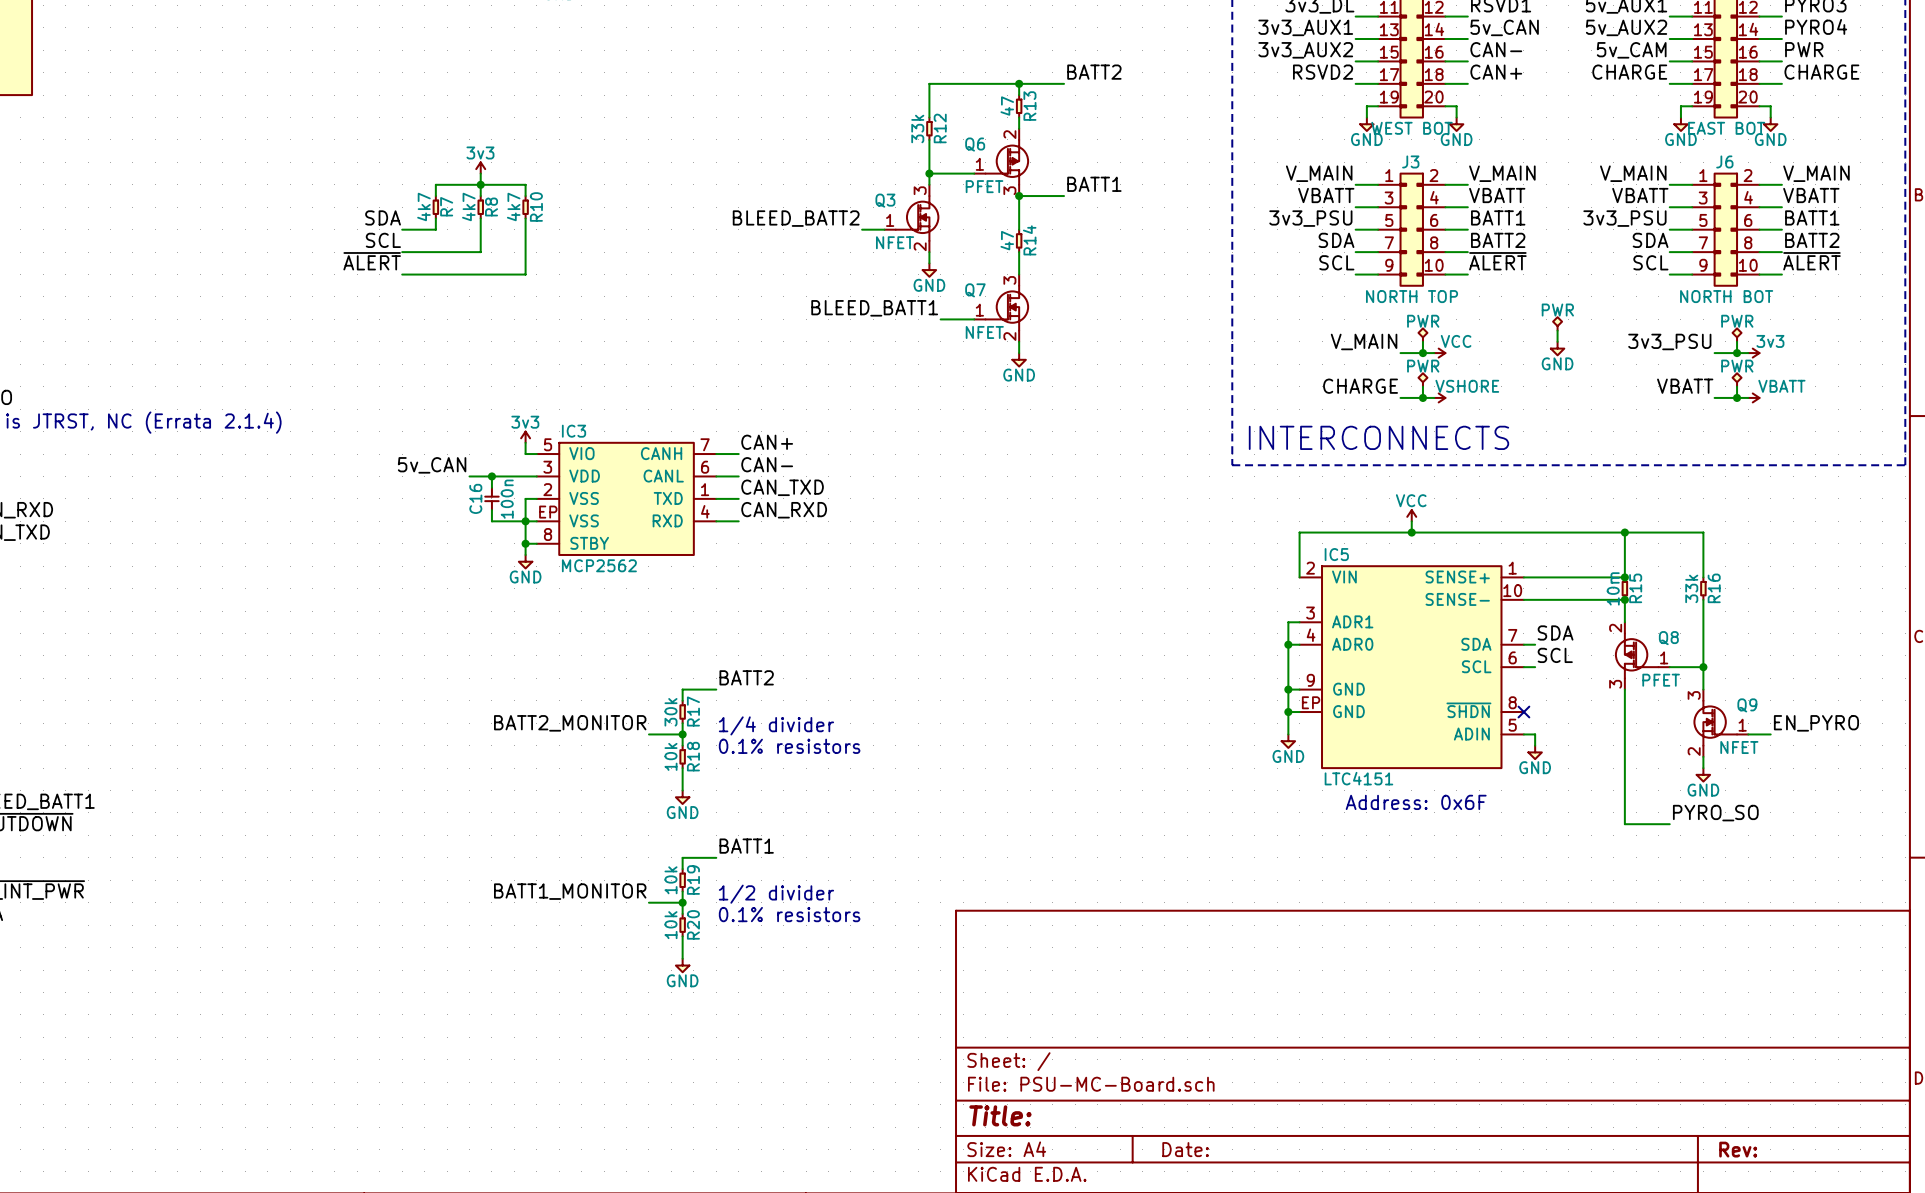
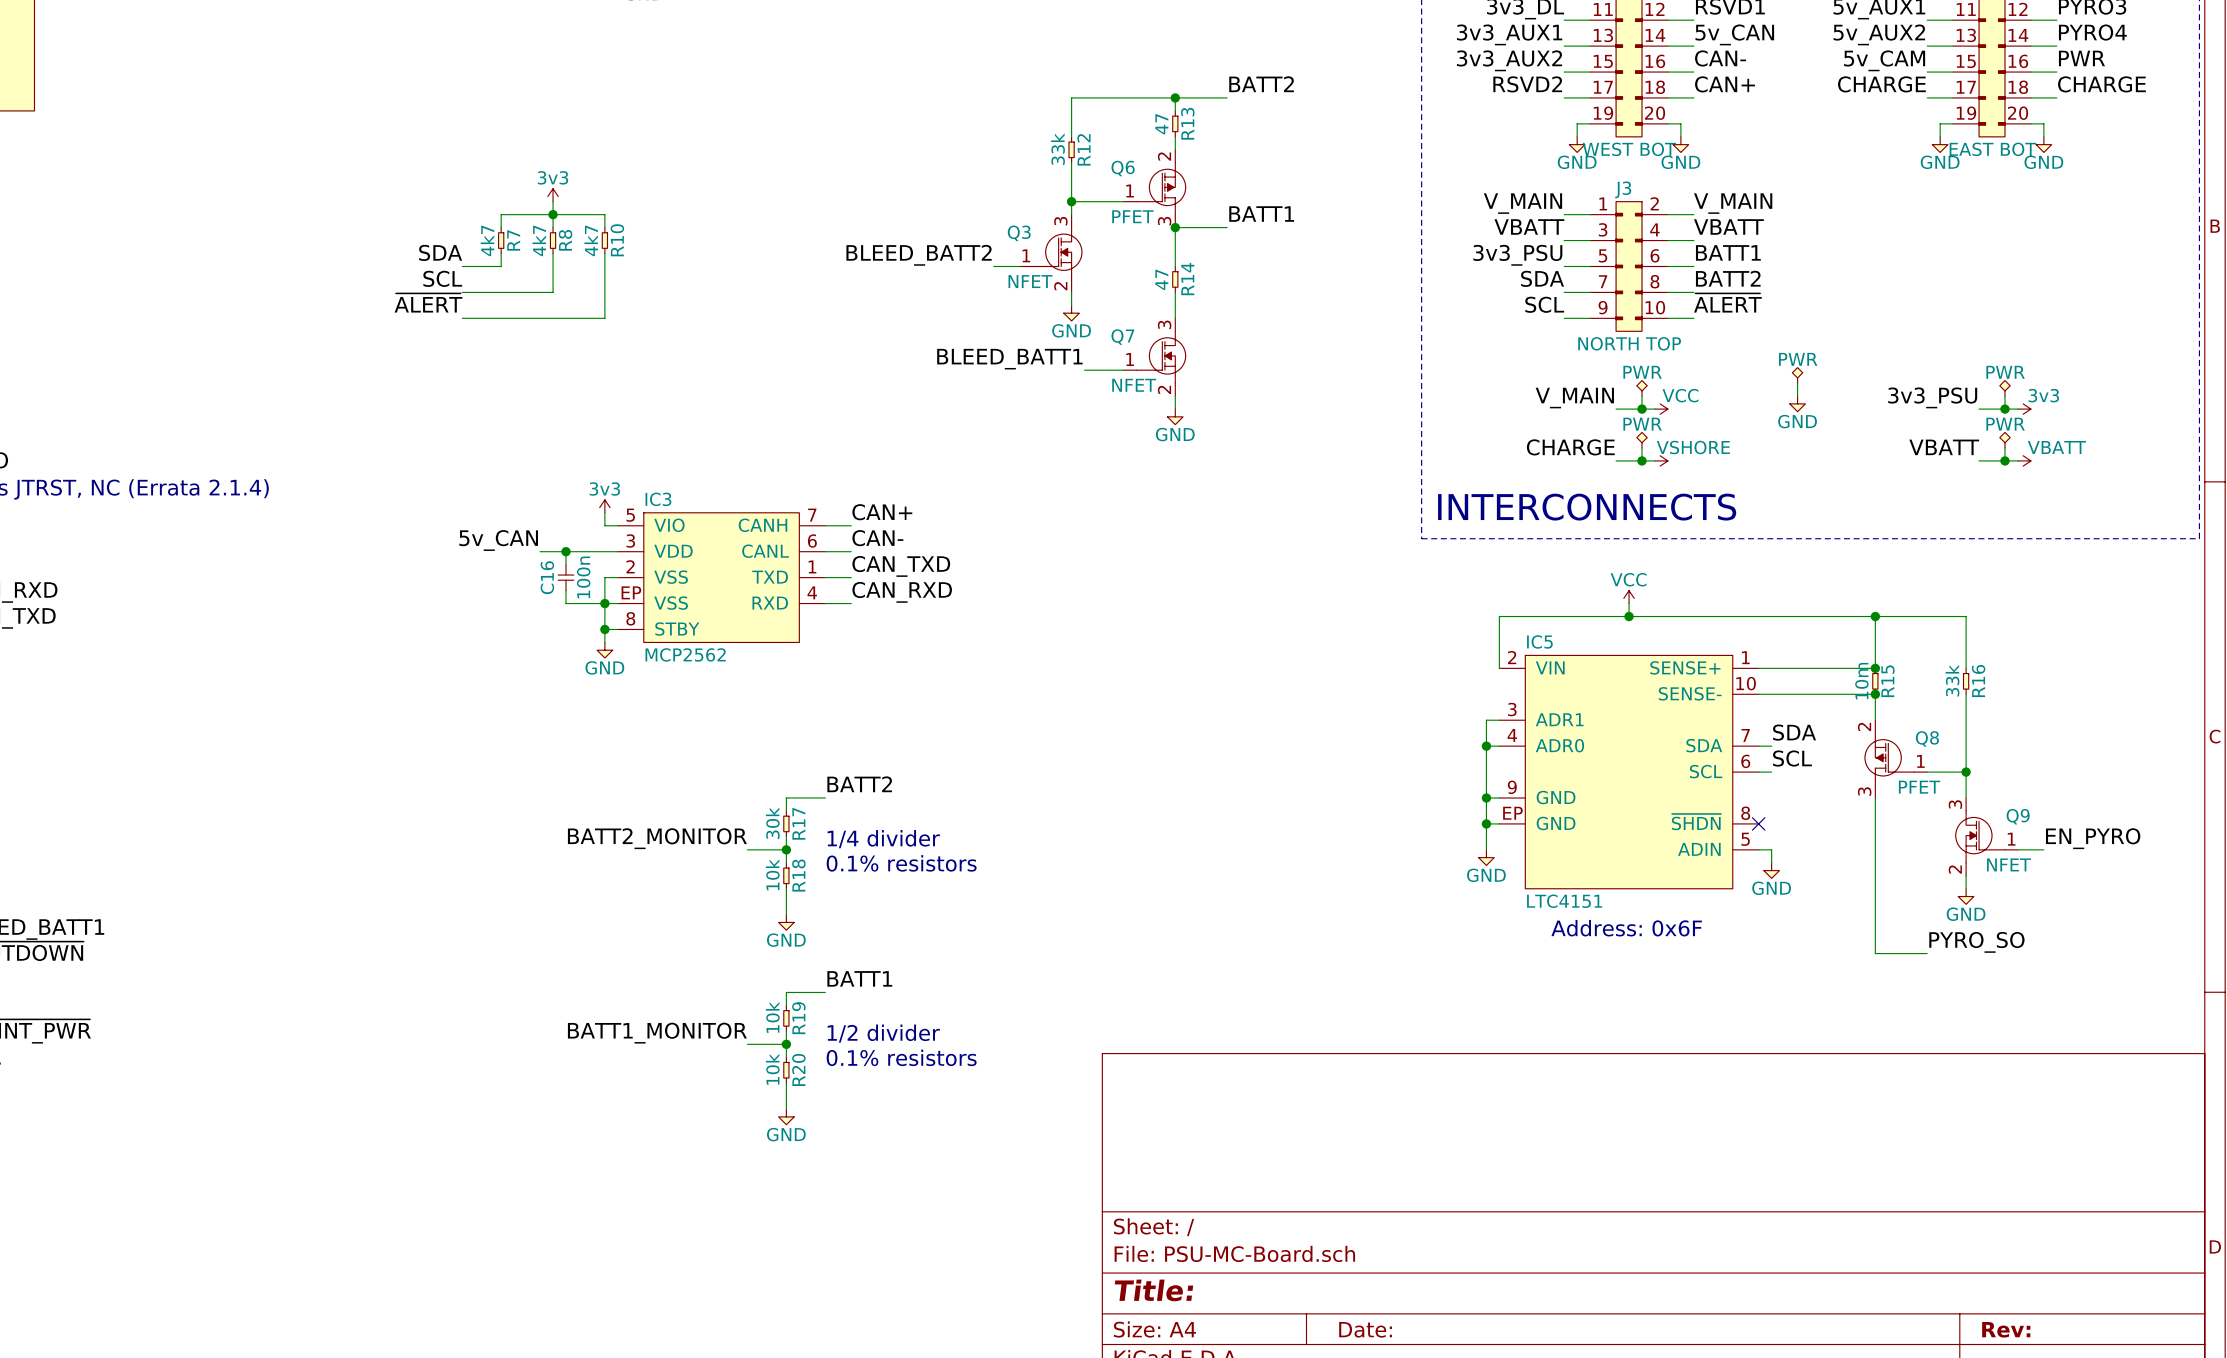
label: V_MAIN (1633, 173) -> none
label: V_MAIN (1816, 173) -> none
wire: (1669, 184) (1692, 184) -> none
wire: (1759, 184) (1781, 184) -> none
label: VBATT (1640, 195) -> none
label: VBATT (1811, 195) -> none
wire: (1669, 207) (1692, 207) -> none
wire: (1759, 207) (1781, 207) -> none
label: BATT1 (1812, 217) -> none
label: 3v3_PSU (1624, 218) -> none
wire: (1669, 229) (1692, 229) -> none
J6: NORTH BOT (1725, 229) -> none
wire: (1759, 229) (1781, 229) -> none
label: SDA (1650, 240) -> none
label: BATT2 (1812, 240) -> none
wire: (1669, 252) (1692, 252) -> none
wire: (1759, 252) (1781, 252) -> none
label: ~{ALERT} (1811, 261) -> none
label: SCL (1650, 262) -> none
wire: (1669, 274) (1692, 274) -> none
wire: (1759, 274) (1781, 274) -> none

